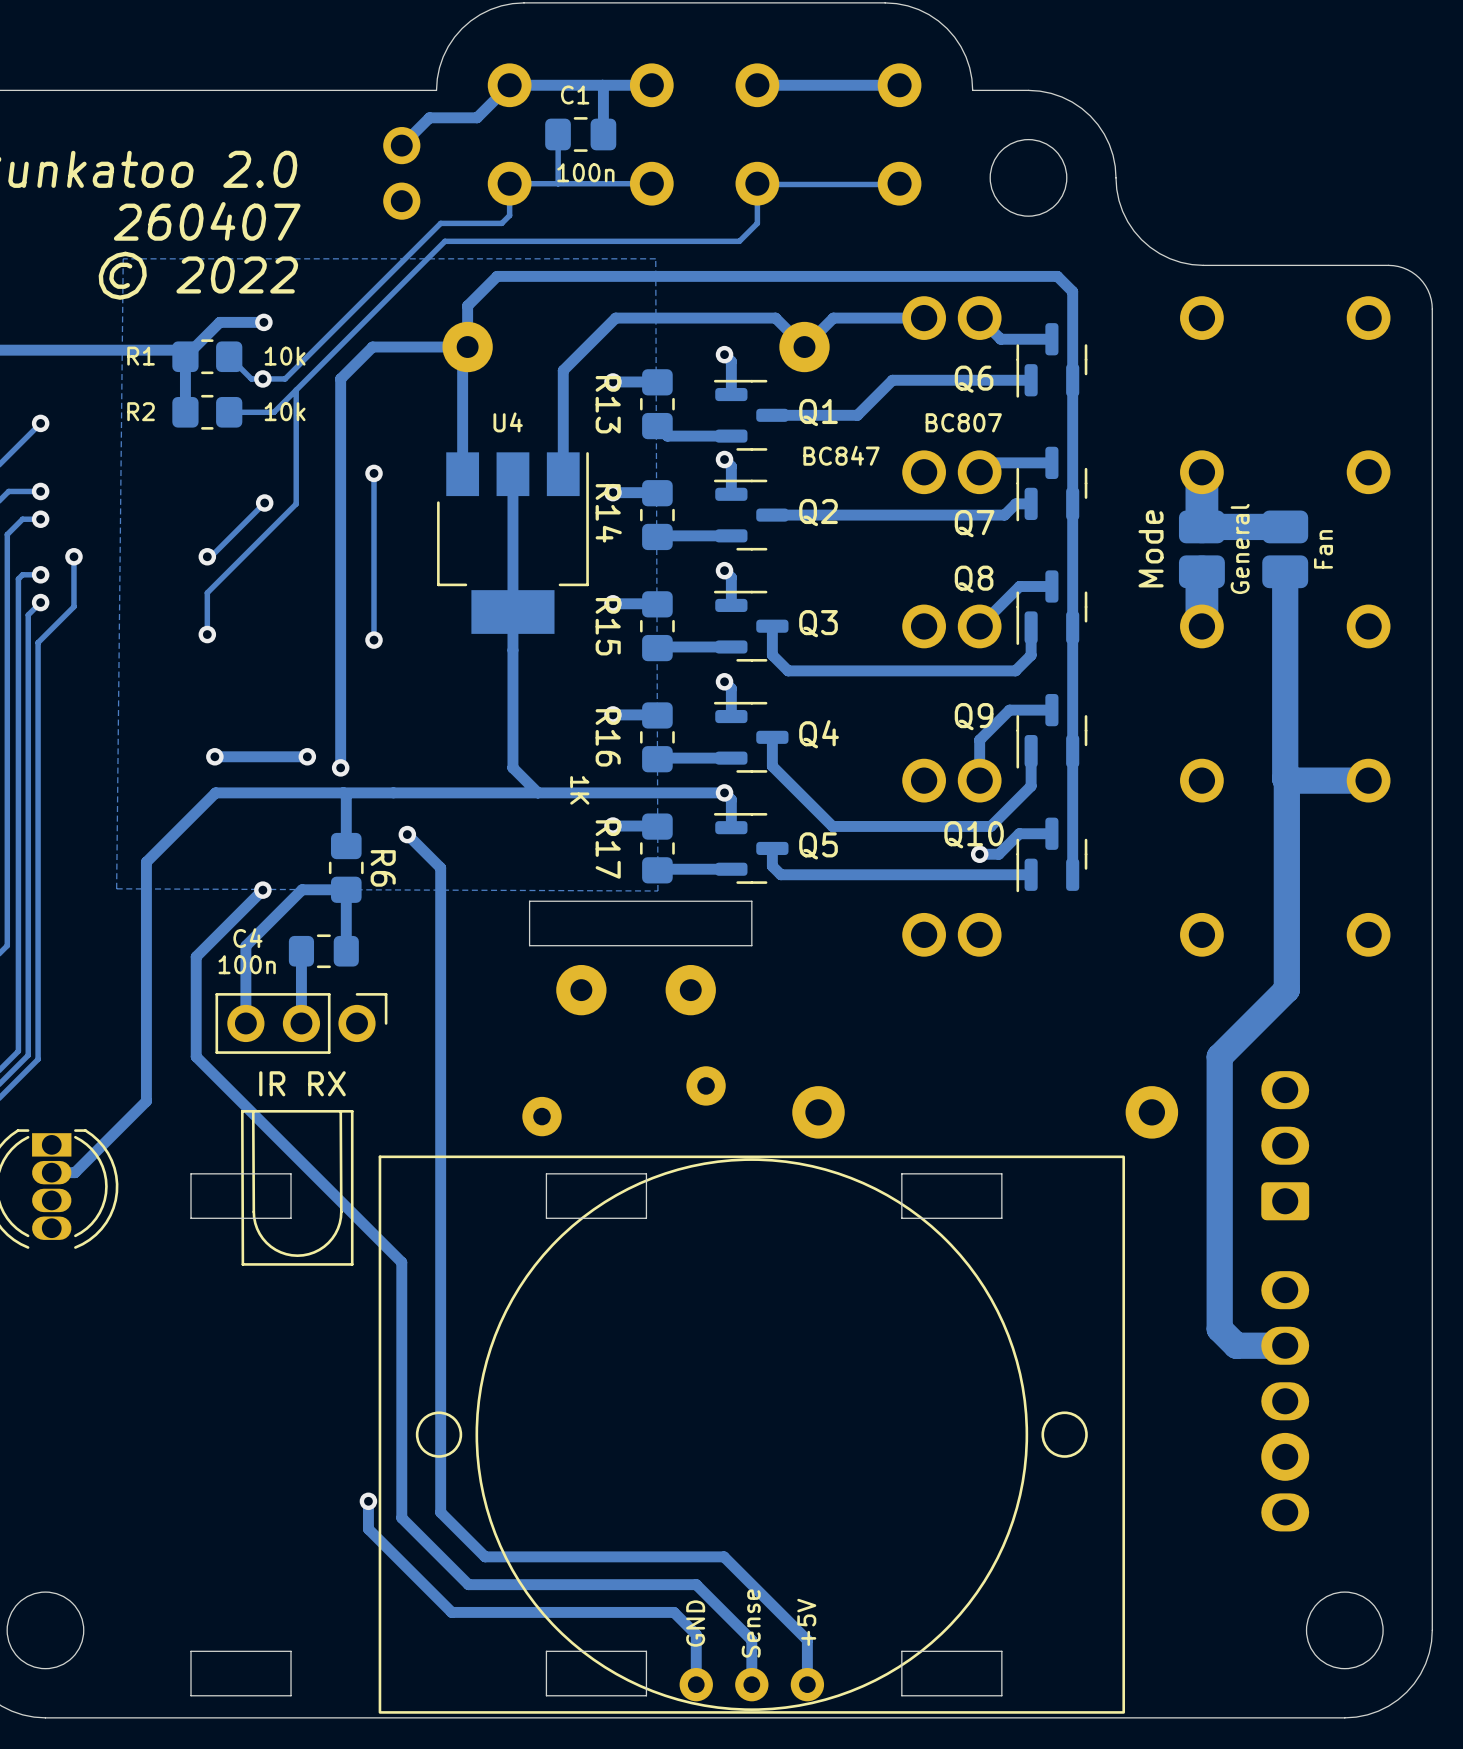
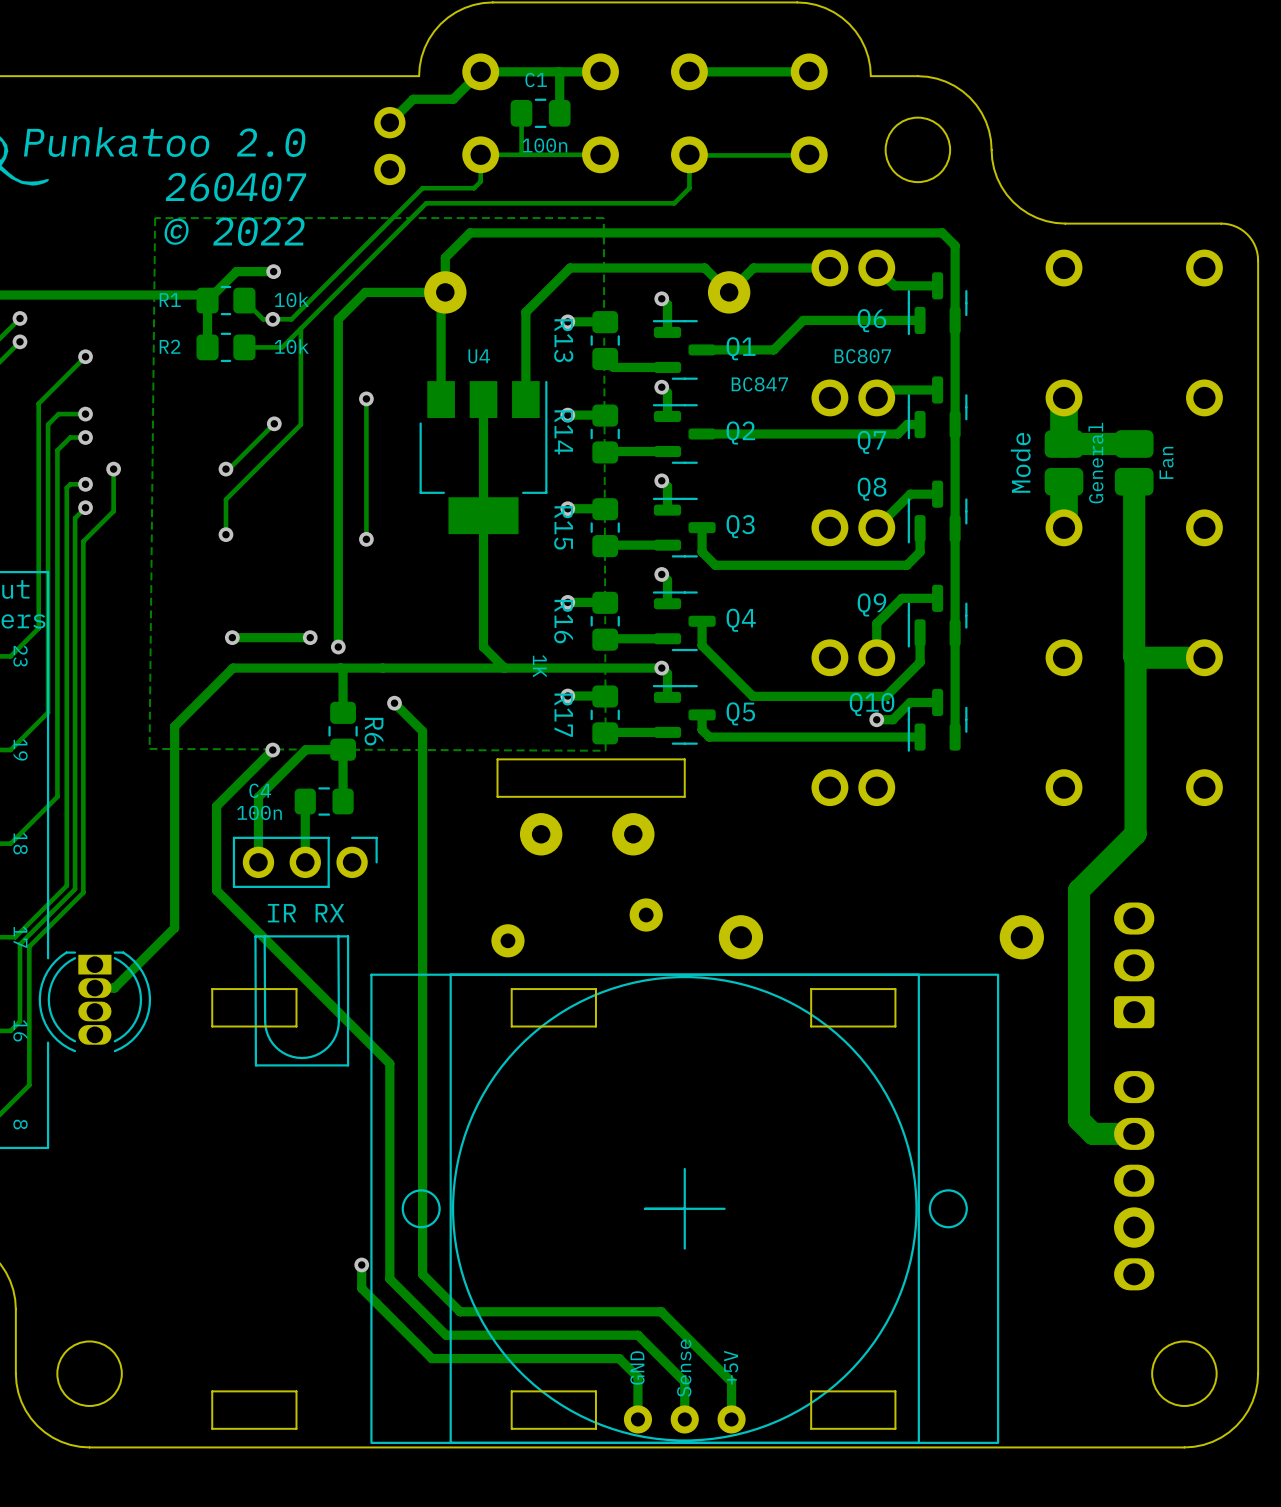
part footprint: [378, 1155, 1126, 1714] -> [370, 973, 1000, 1444]

